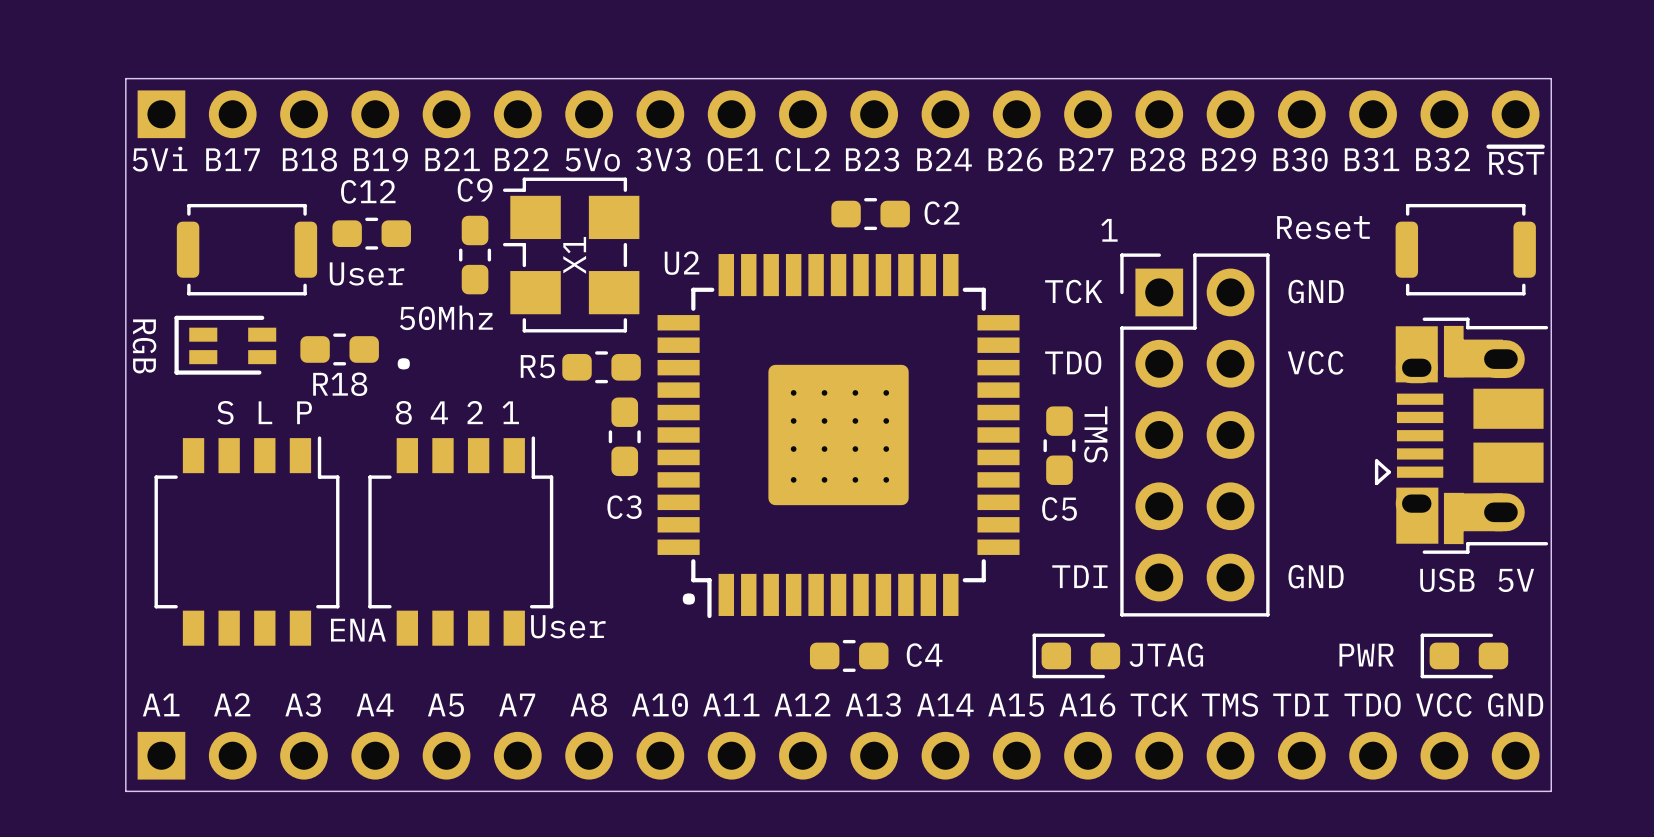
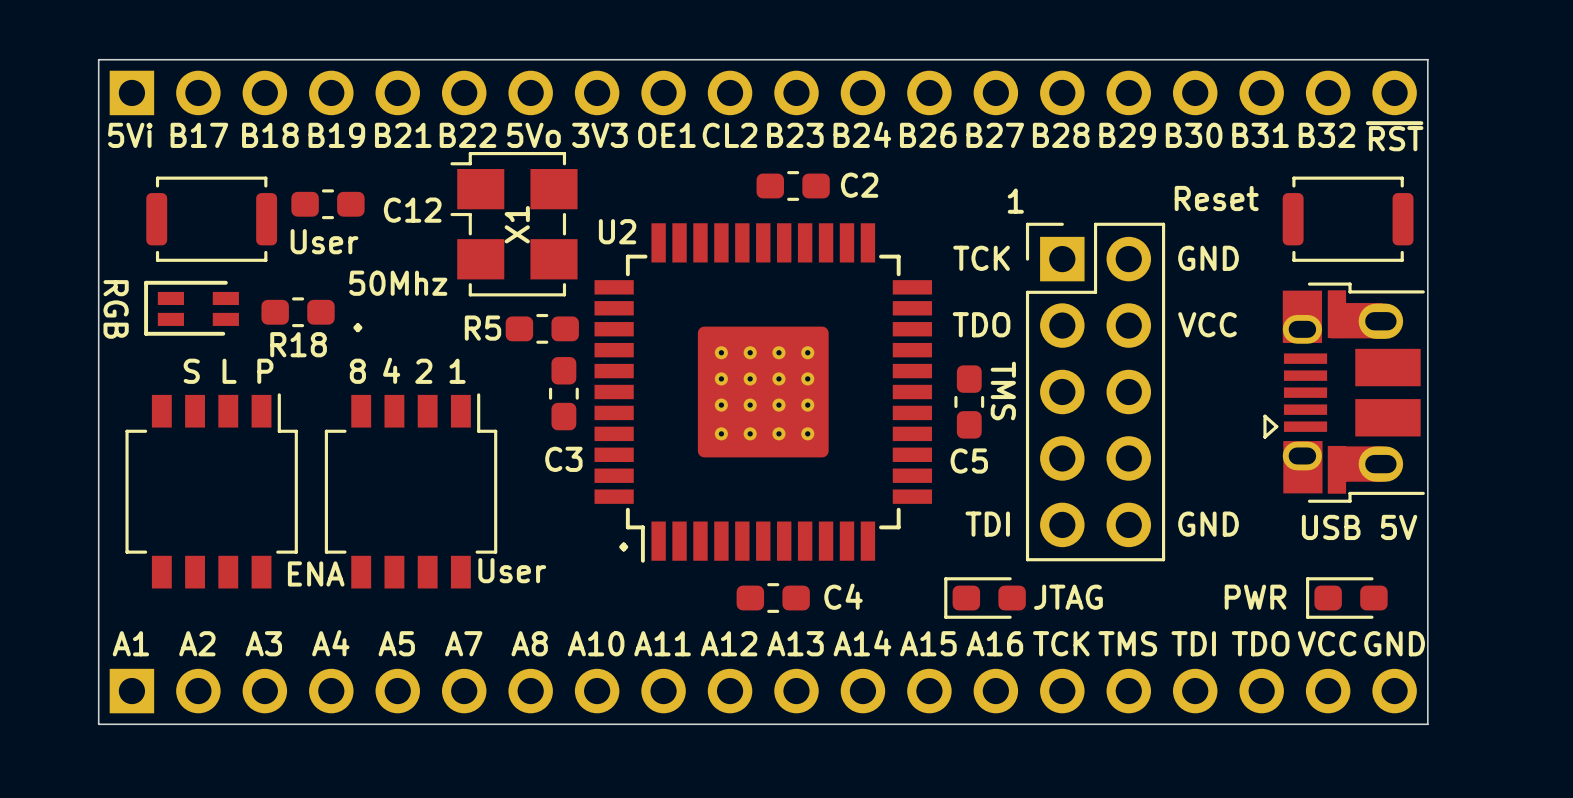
C12 name position: C12 (368, 191) -> C12 (412, 210)
C9: (475, 255) -> none

